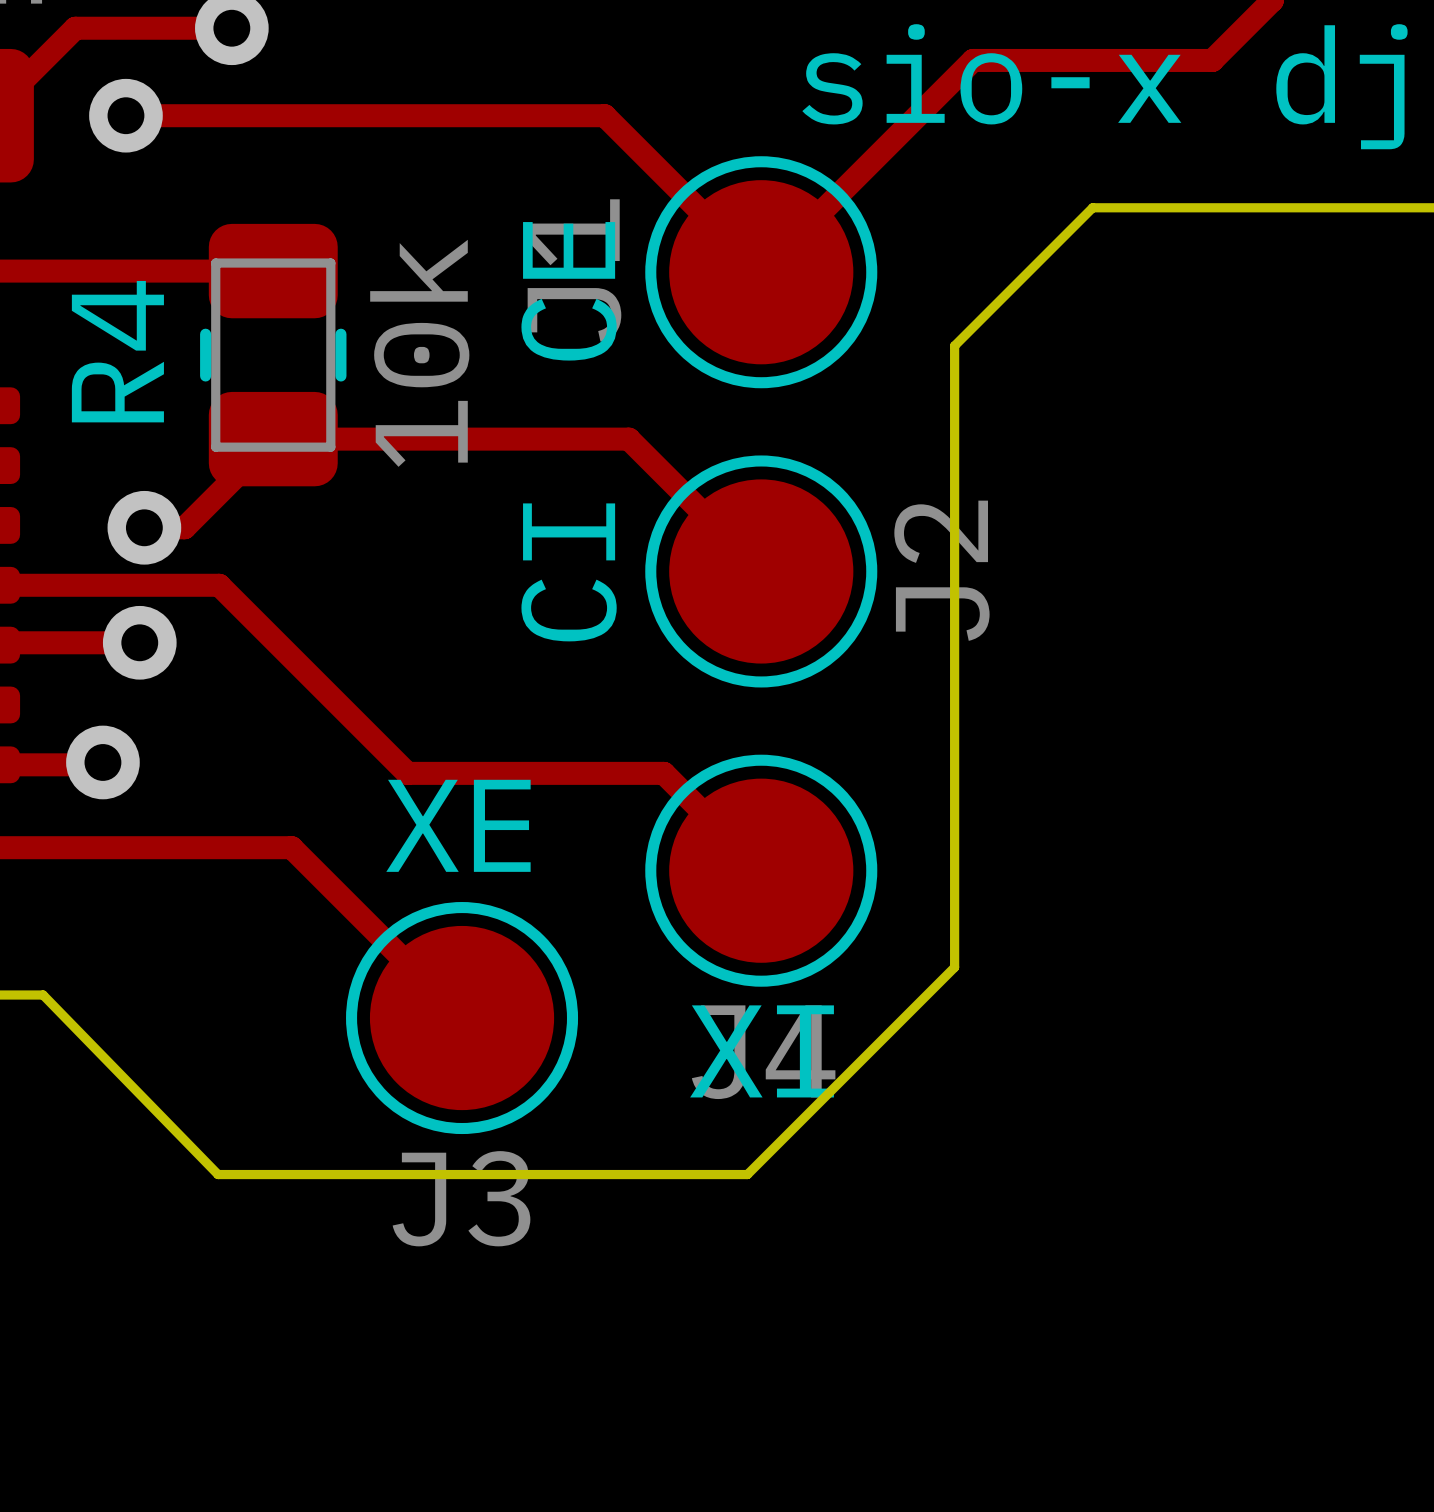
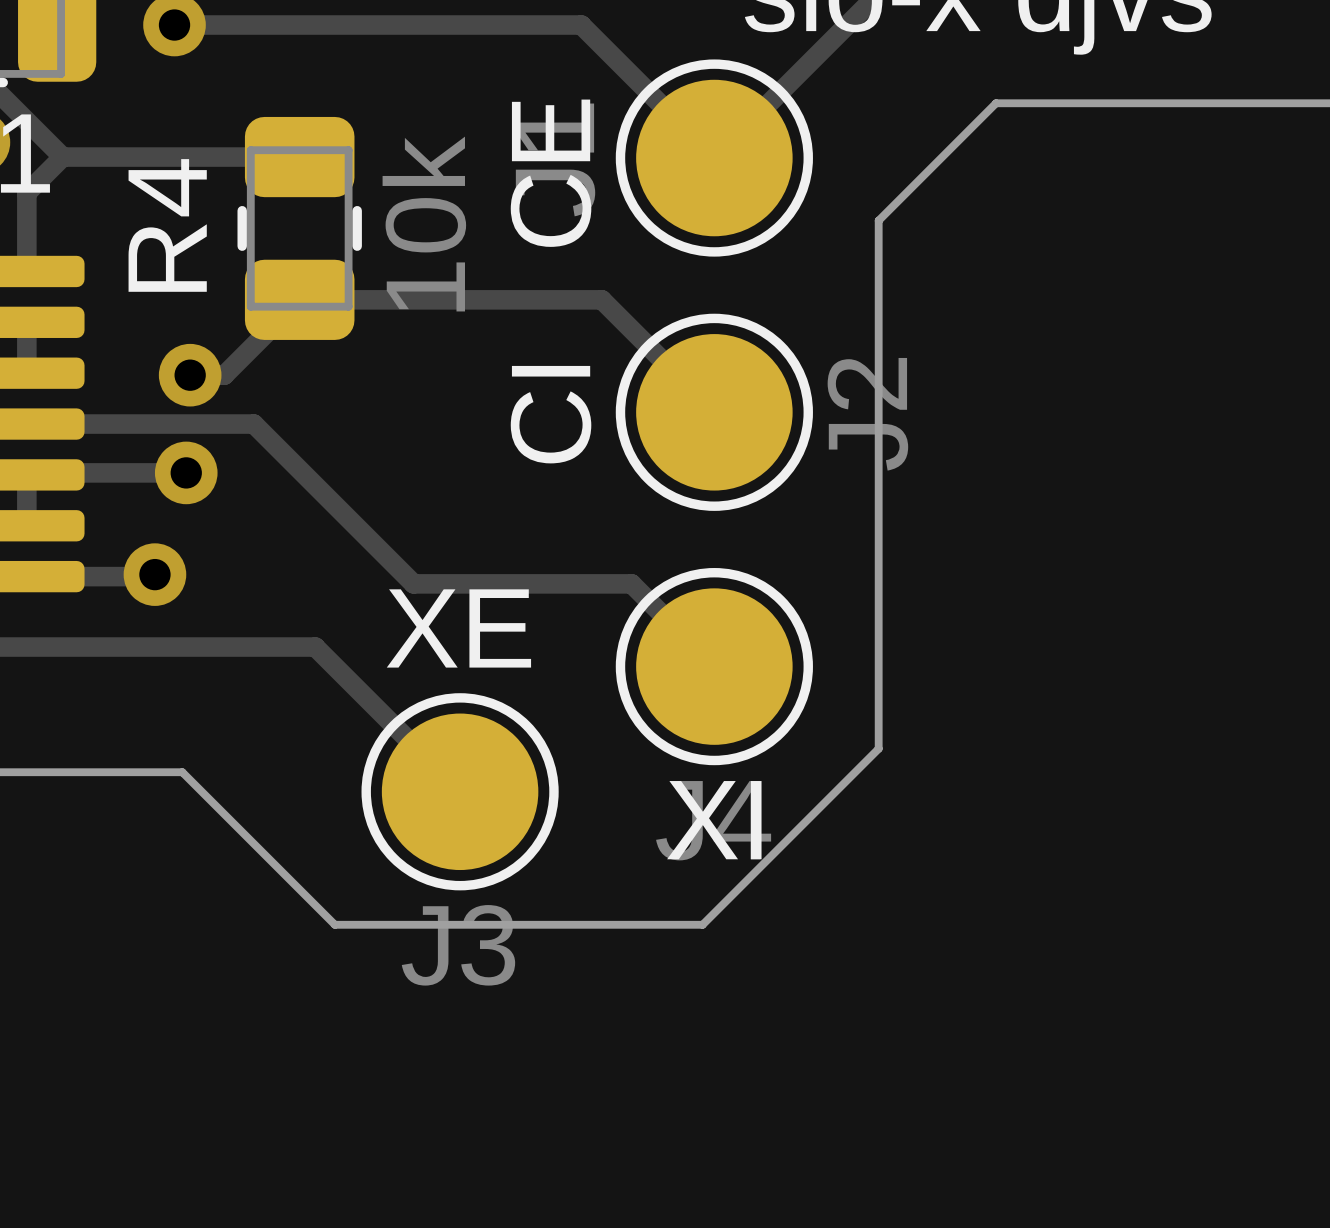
board edge: (43, 995) (218, 1174) (314, 1174) -> (104, 772) (182, 772) (334, 924)

